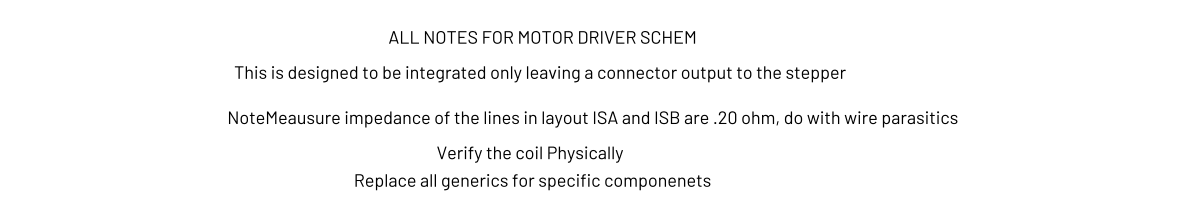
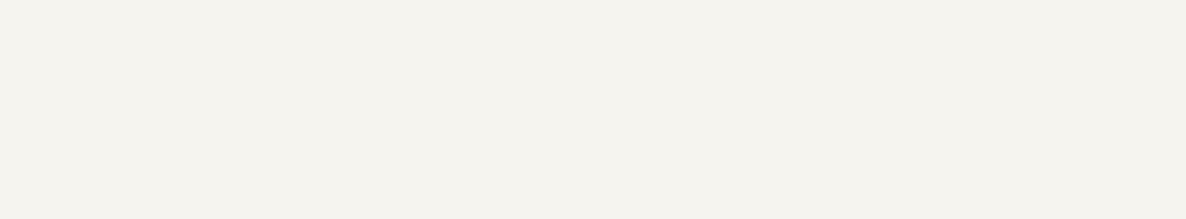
text: ALL NOTES FOR MOTOR DRIVER SCHEM (542, 37) -> none
text: This is designed to be integrated only leaving a connector output to the stepper (540, 74) -> none
text: NoteMeausure impedance of the lines in layout ISA and ISB are .20 ohm, do with wire parasitics (593, 119) -> none
text: Verify the coil Physically (530, 154) -> none
text: Replace all generics for specific componenets (532, 182) -> none

